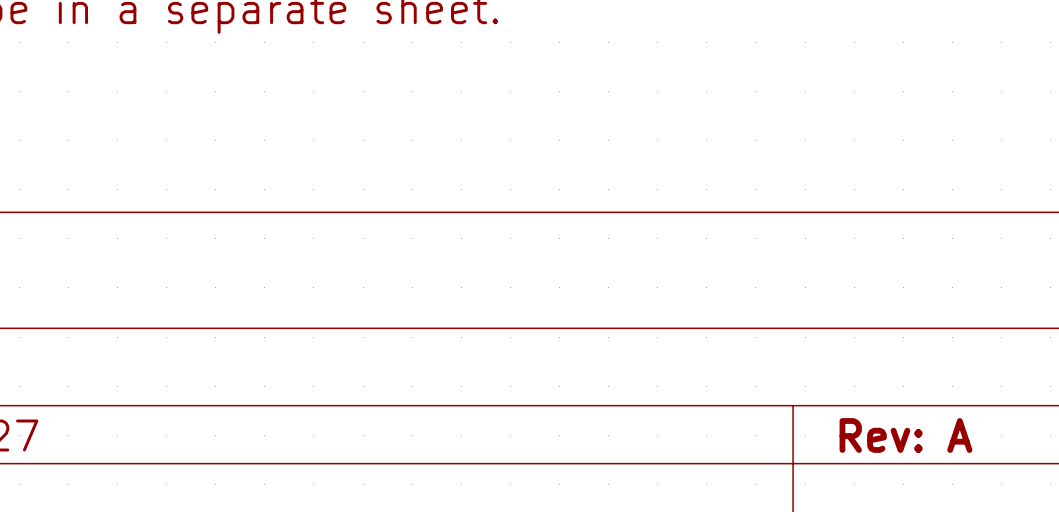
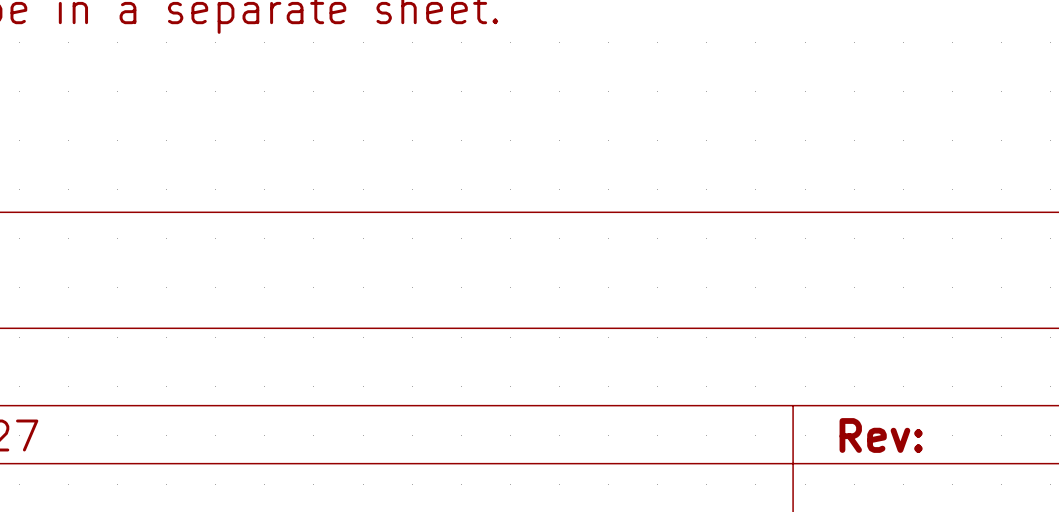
title block: Rev: A (905, 435) -> Rev: (881, 435)

